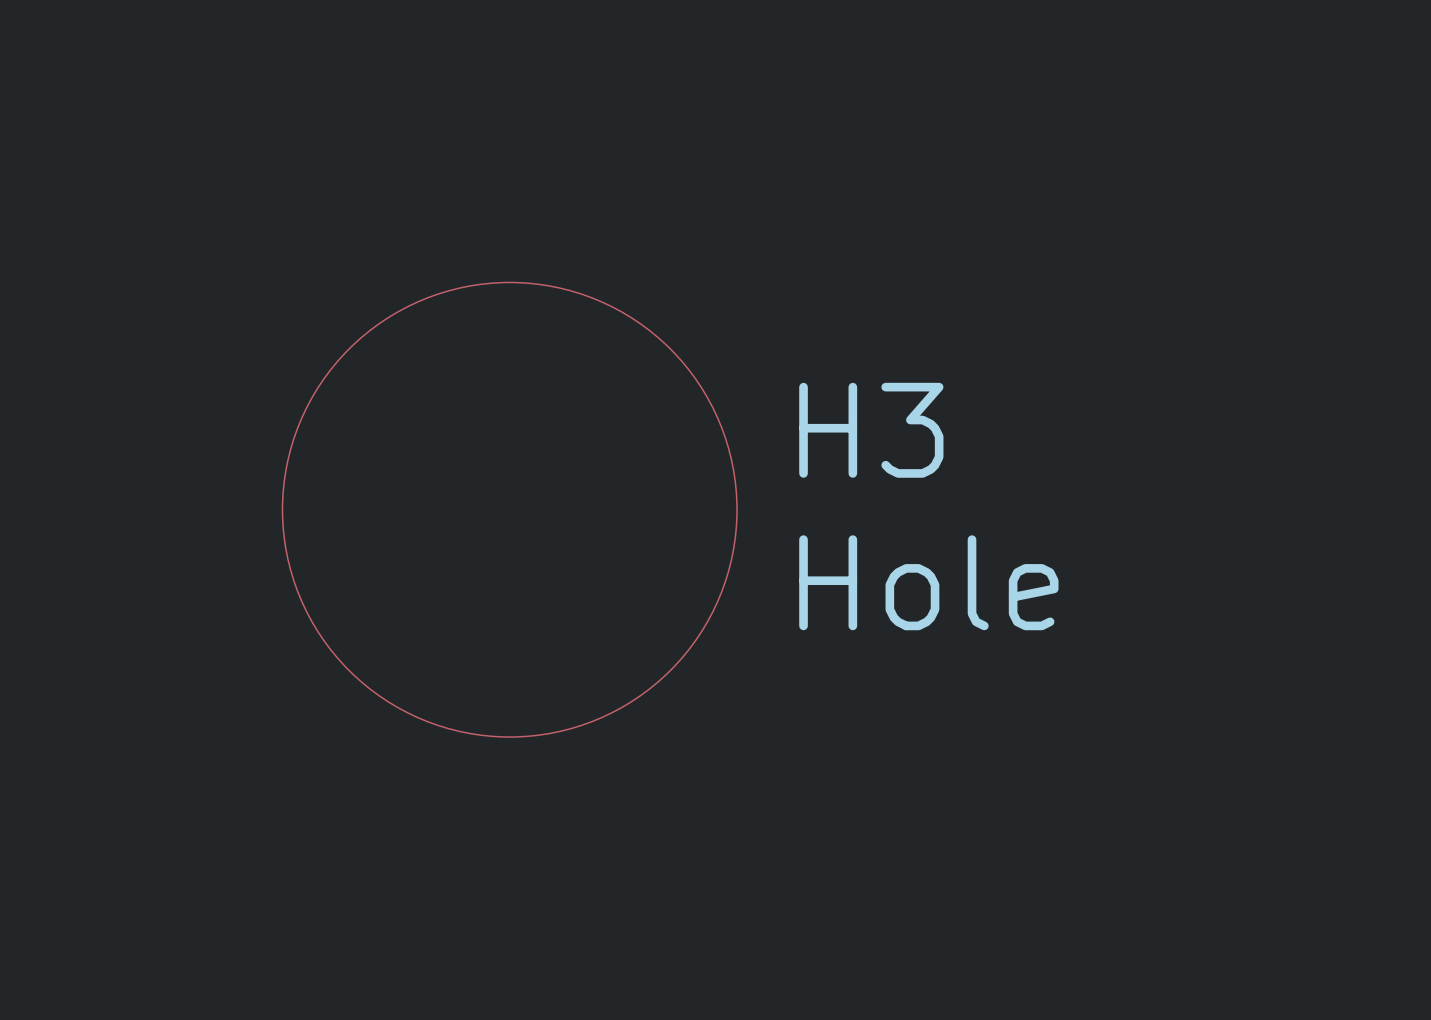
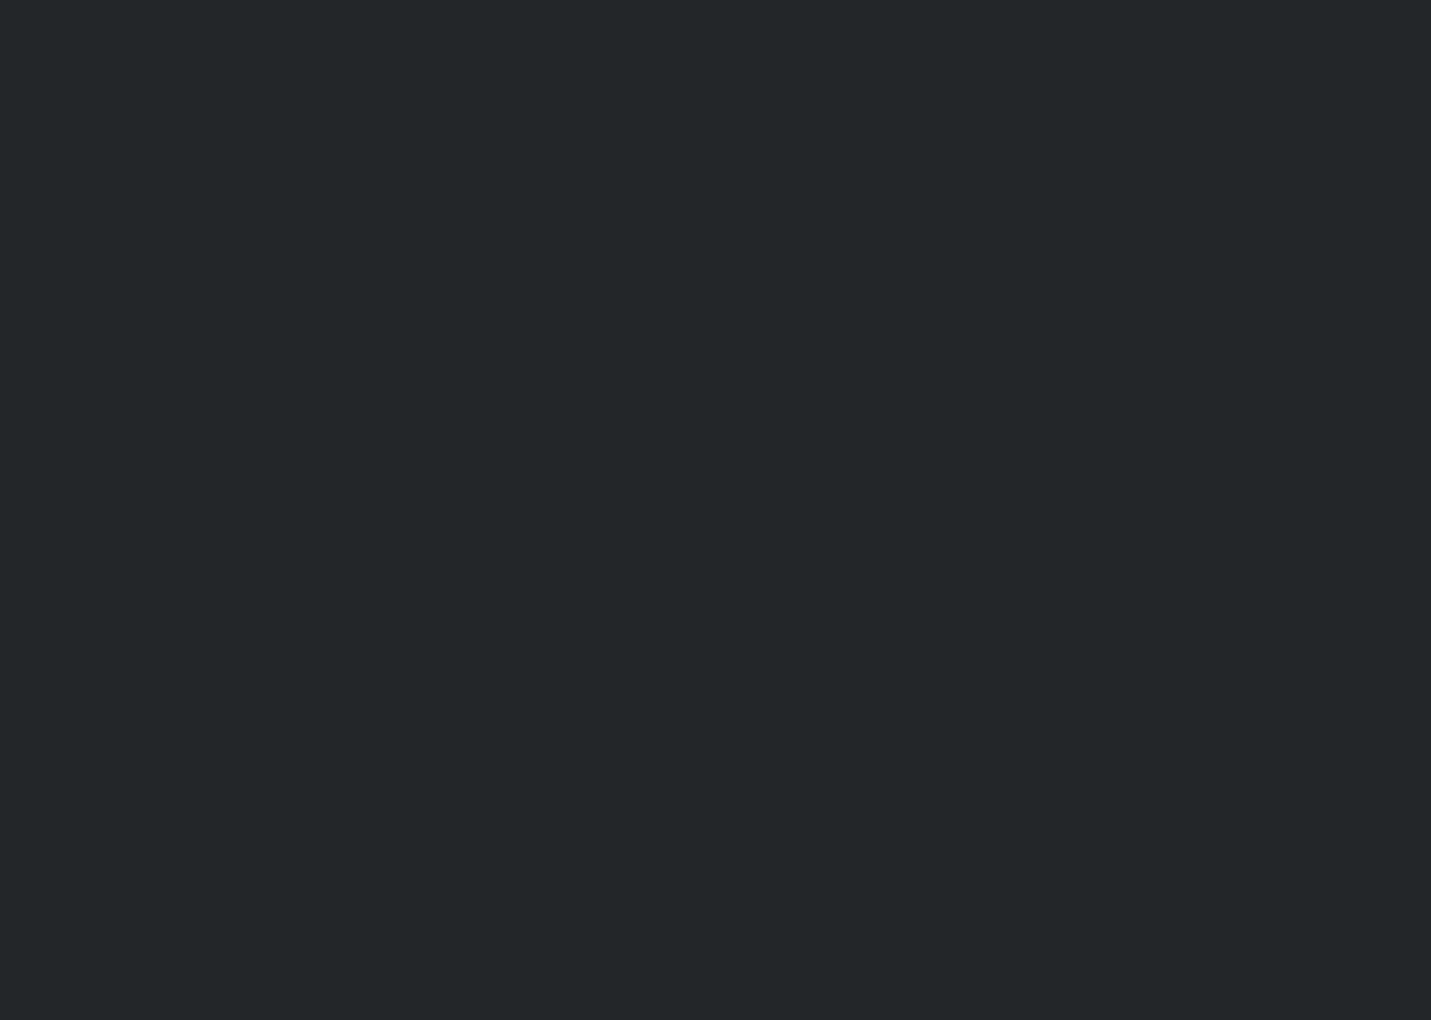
H3: Hole (509, 509) -> none

